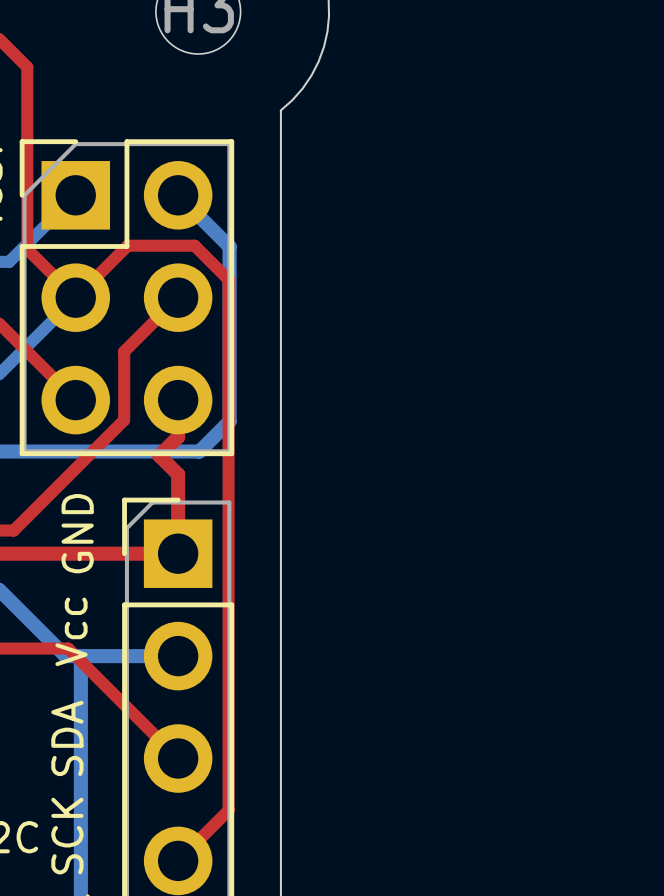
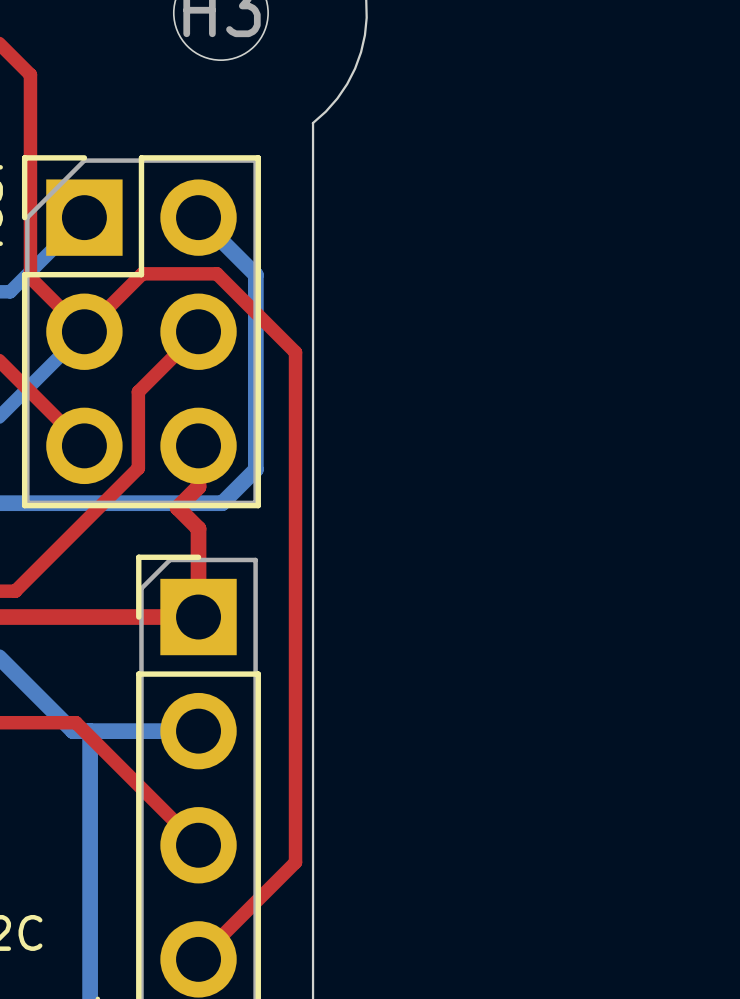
top track: (228, 279) (228, 810) -> (254, 311) (295, 352) (295, 862) (254, 903)
text: GND (77, 533) -> none
text: Vcc (71, 631) -> none
text: SDA (67, 738) -> none
text: SCK (67, 836) -> none

